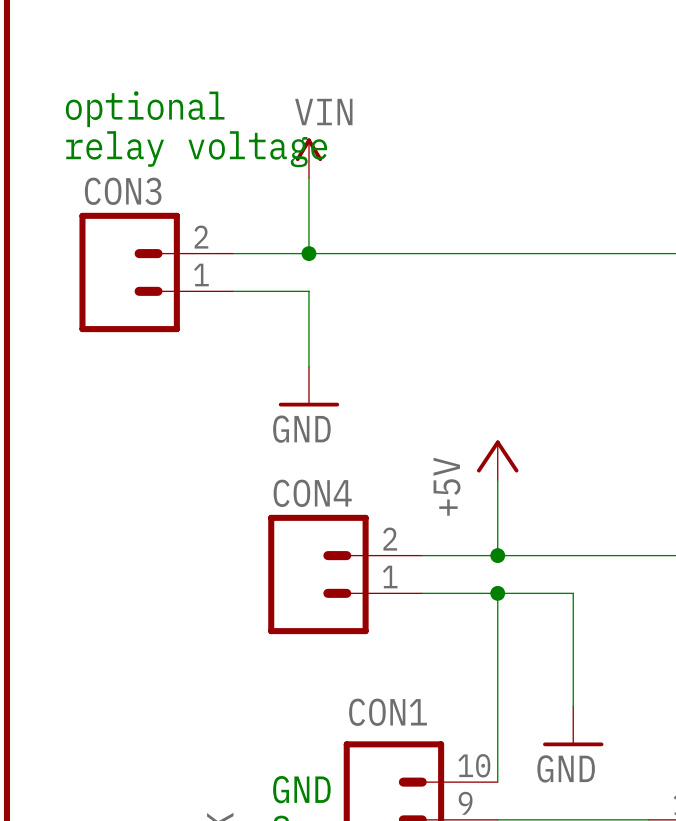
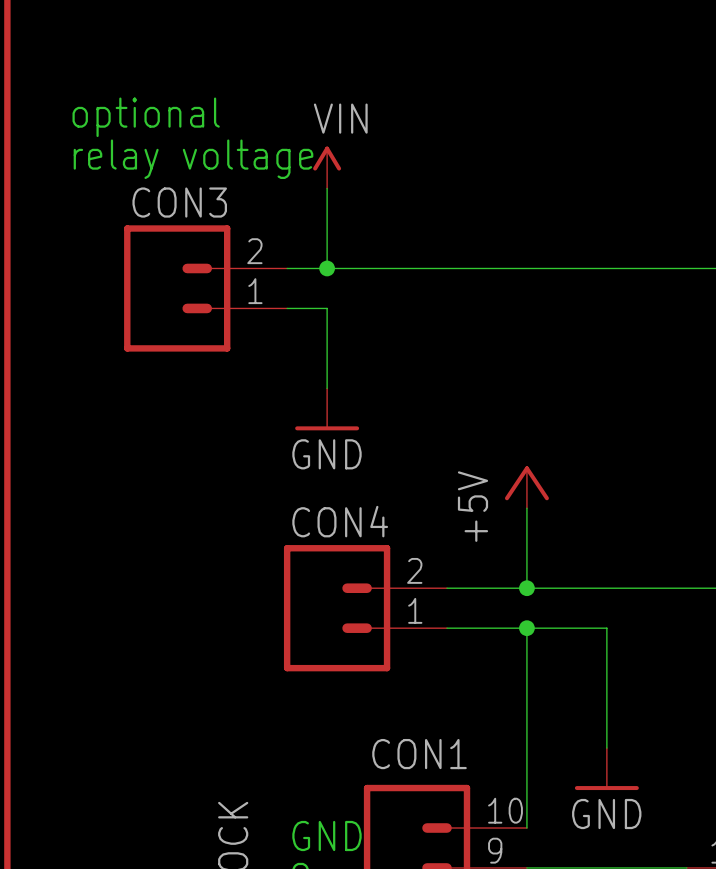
CON3 position: (156, 272) -> (205, 288)

